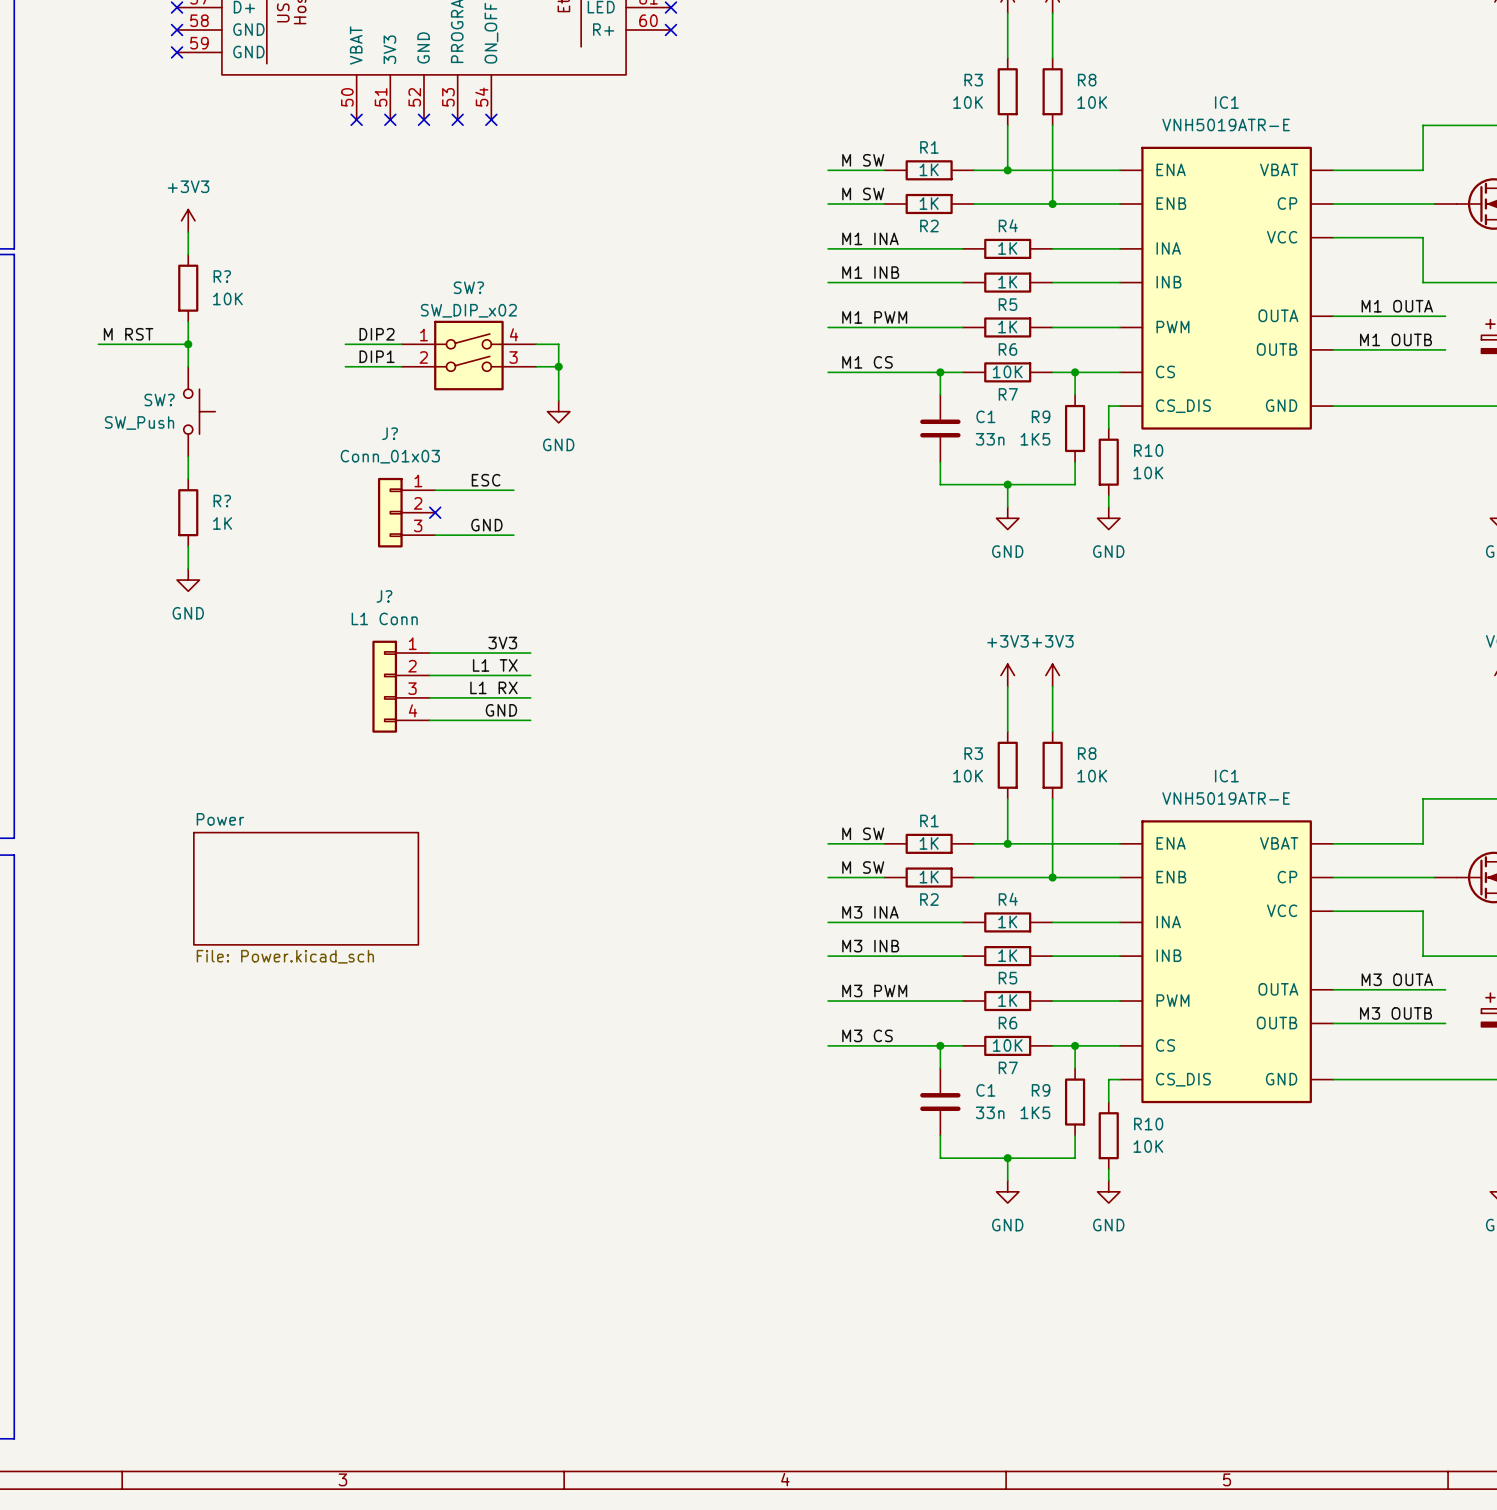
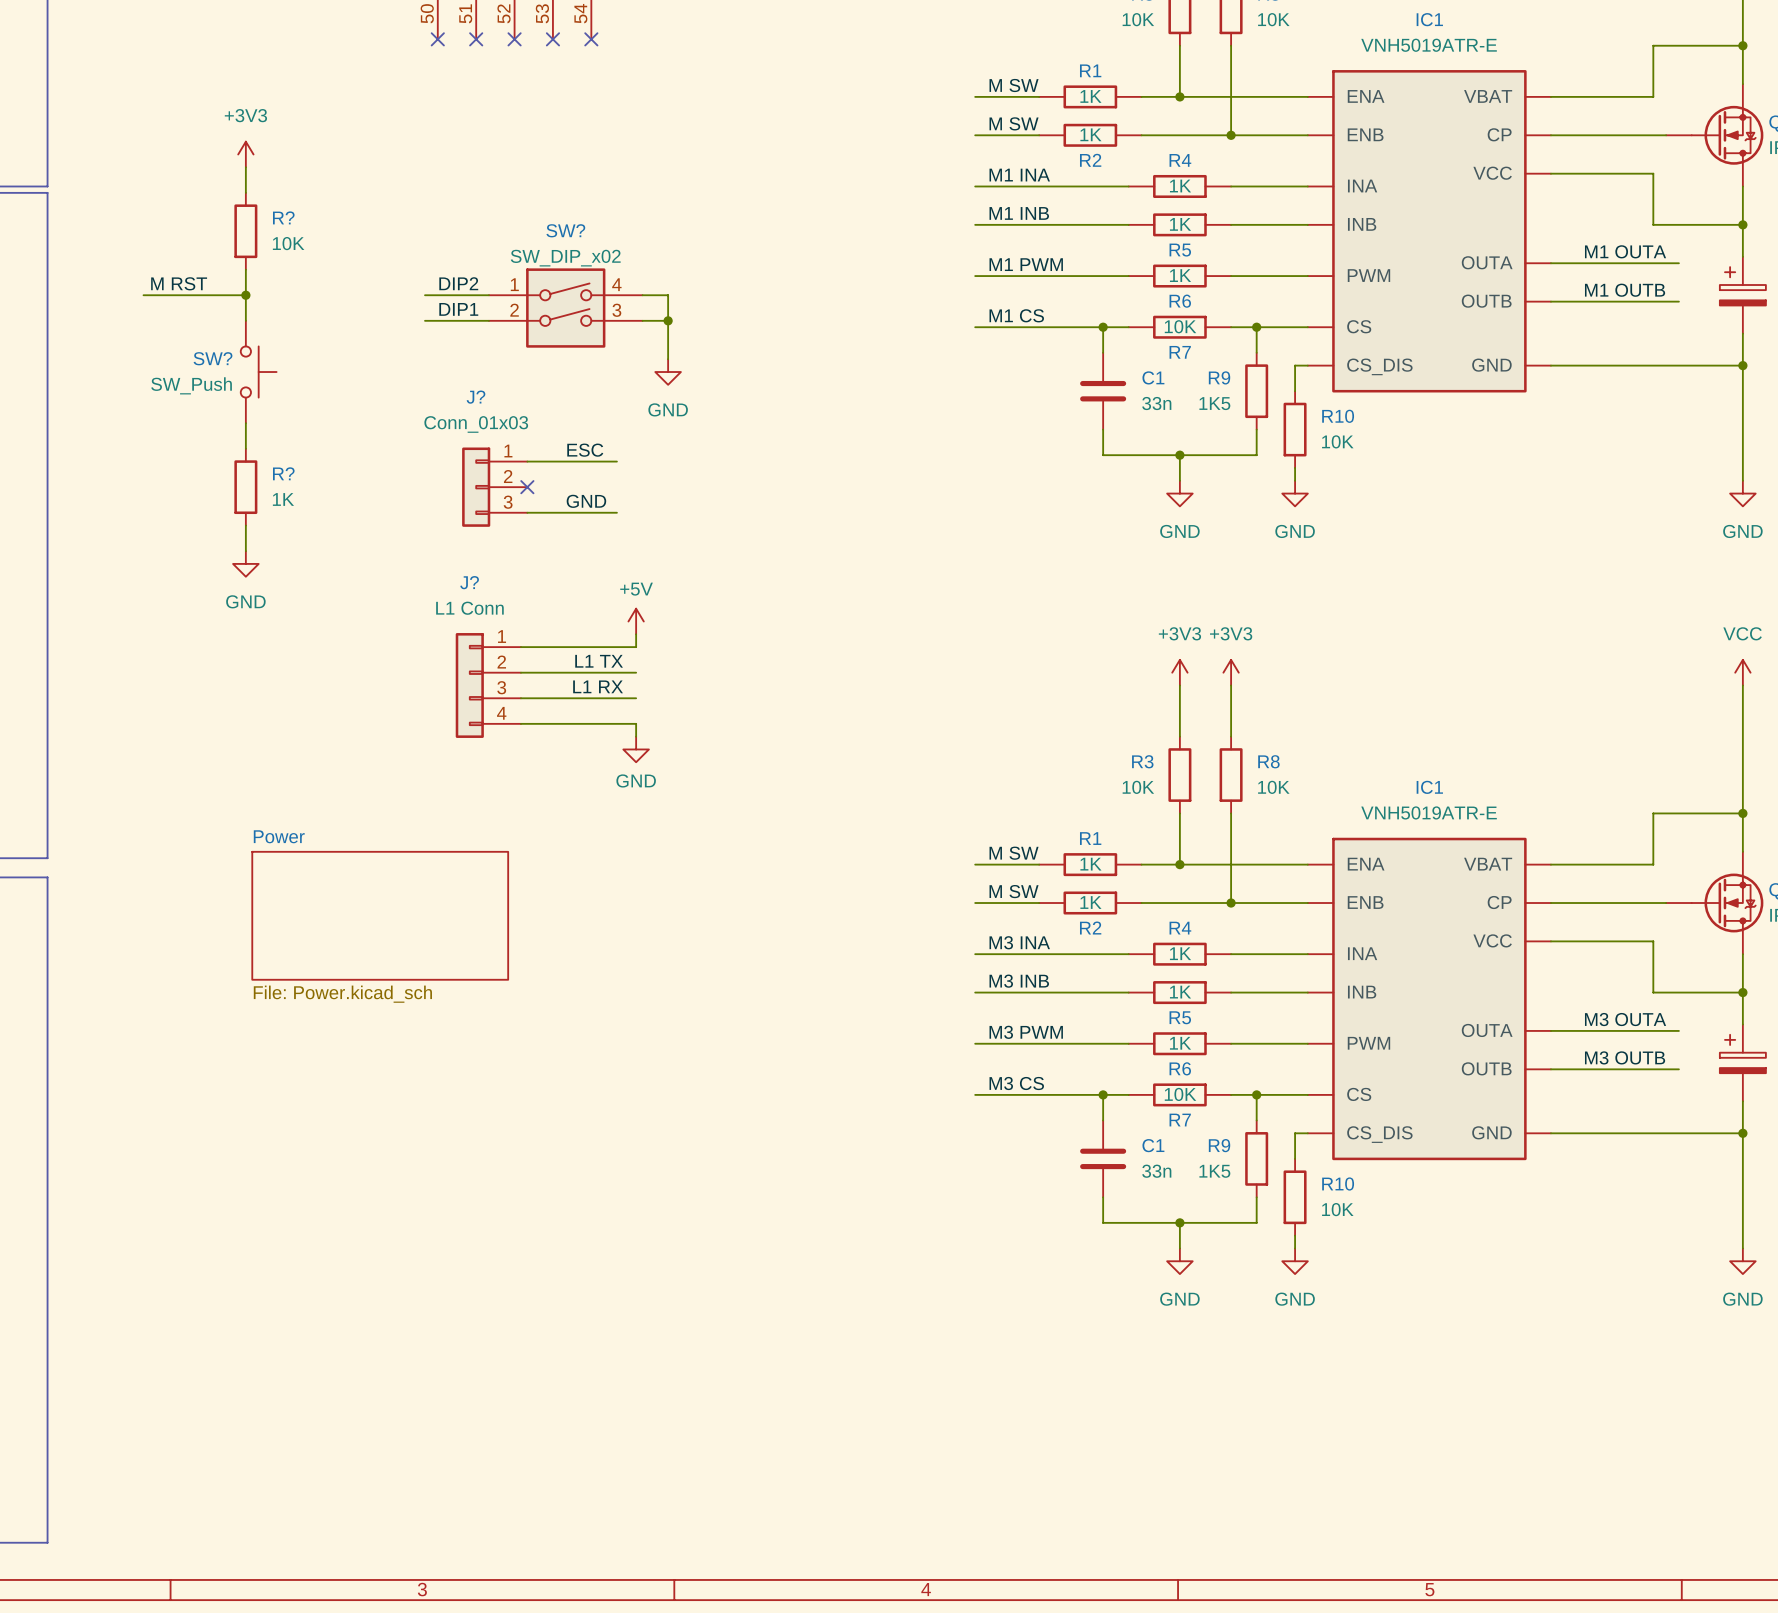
power symbol: none -> +5V (636, 621)
wire: none -> (636, 634) (636, 647)
label: 3V3 (502, 643) -> none
label: GND (501, 710) -> none
wire: none -> (636, 723) (636, 736)
power symbol: none -> GND (636, 749)

